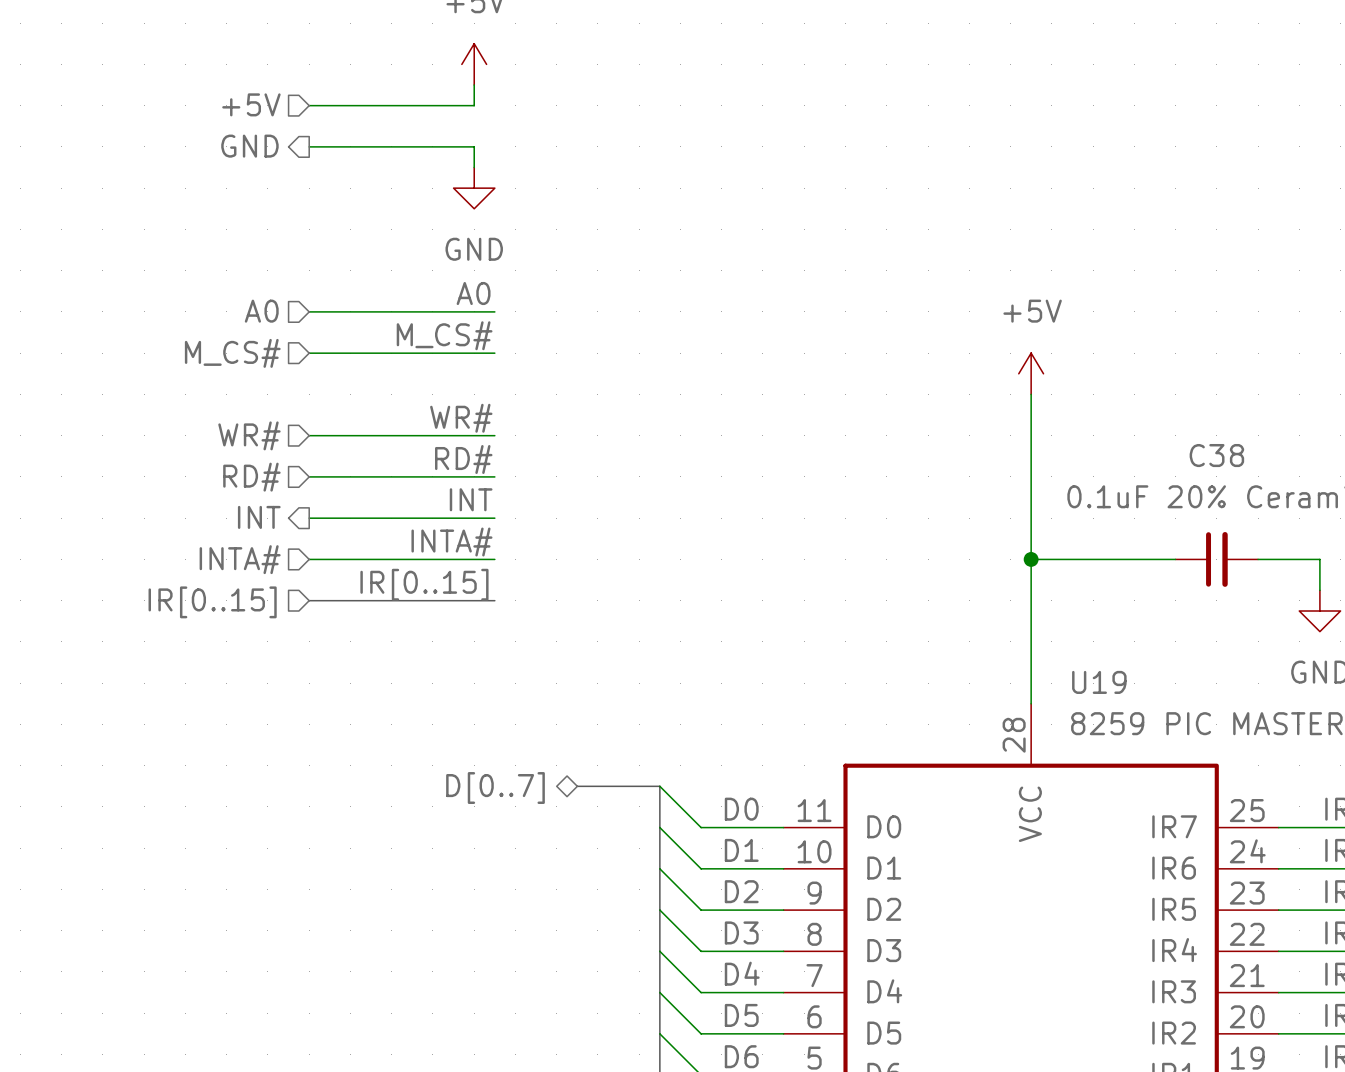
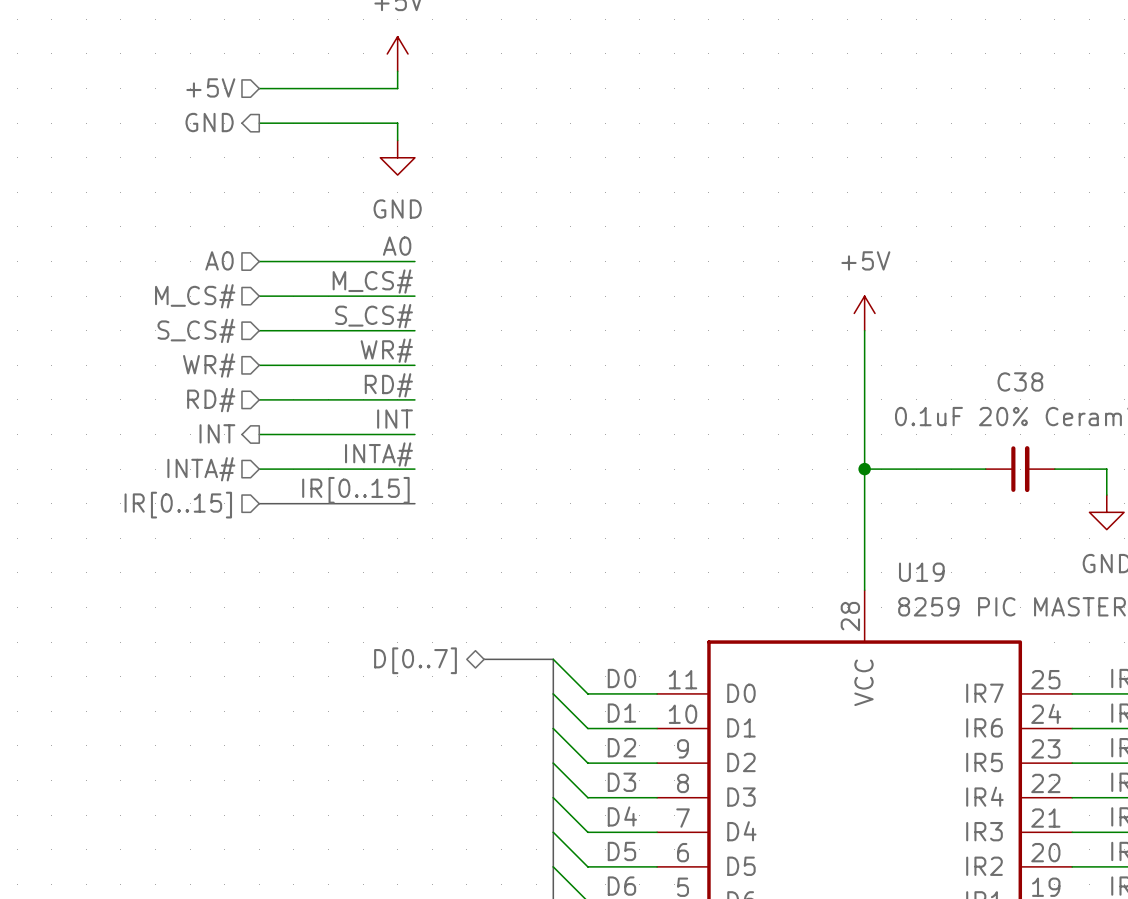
label: none -> S_CS# (374, 316)
hierarchical label: none -> S_CS# (196, 330)
wire: none -> (259, 330) (414, 330)

